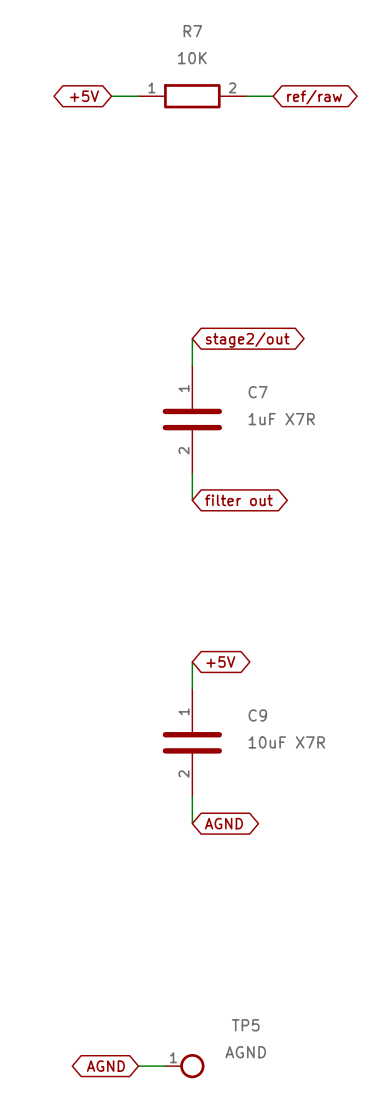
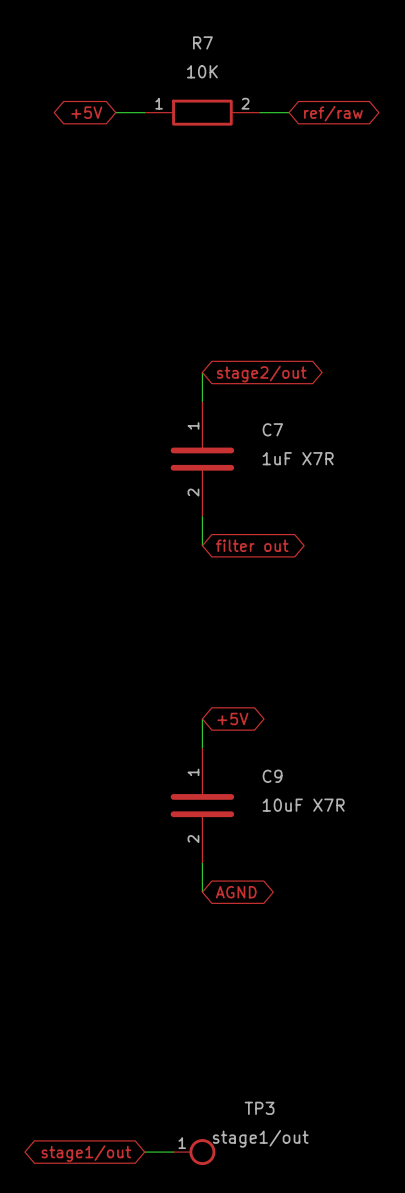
TP5 name: TP5 (245, 1025) -> TP3 (259, 1108)
TP5 value: AGND (245, 1052) -> stage1/out (260, 1138)
global label: AGND (105, 1066) -> stage1/out (86, 1153)

